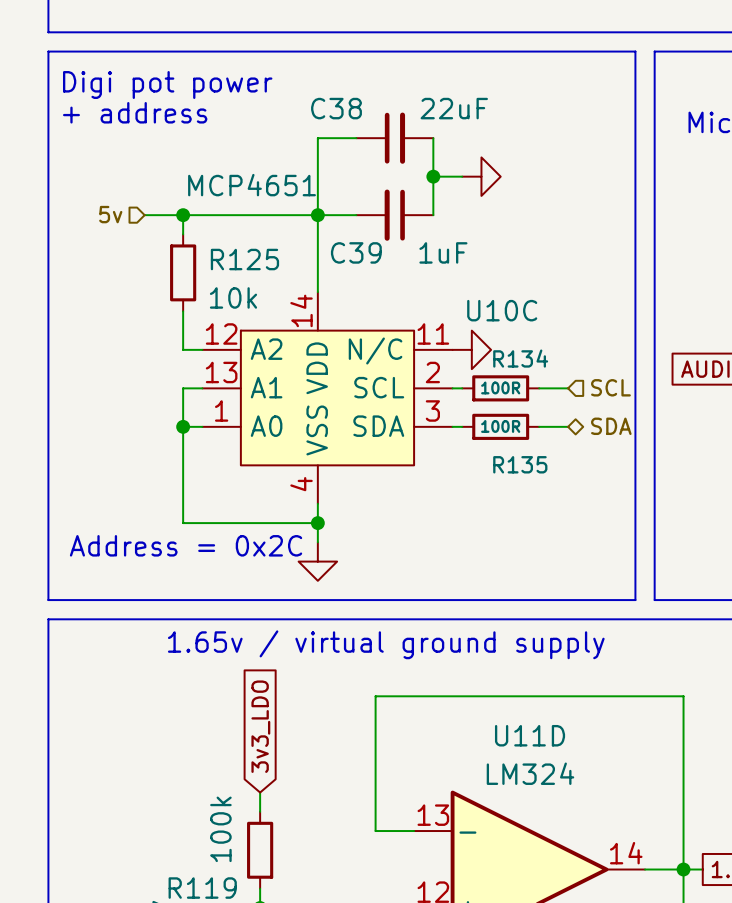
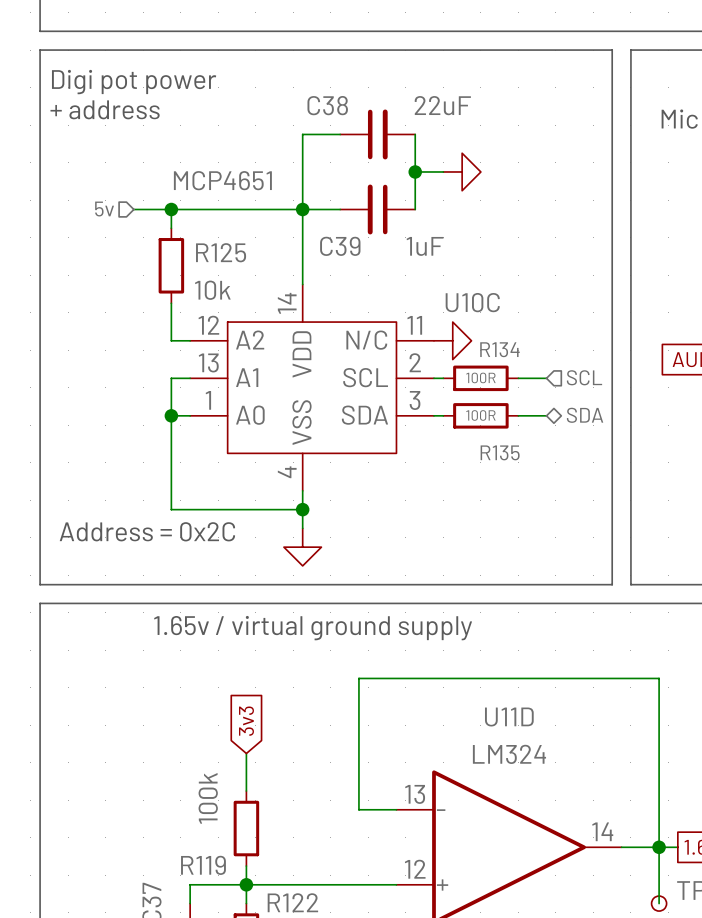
global label: 3v3_LDO (260, 726) -> none
global label: none -> 3v3 (246, 721)
wire: none -> (246, 753) (246, 772)

